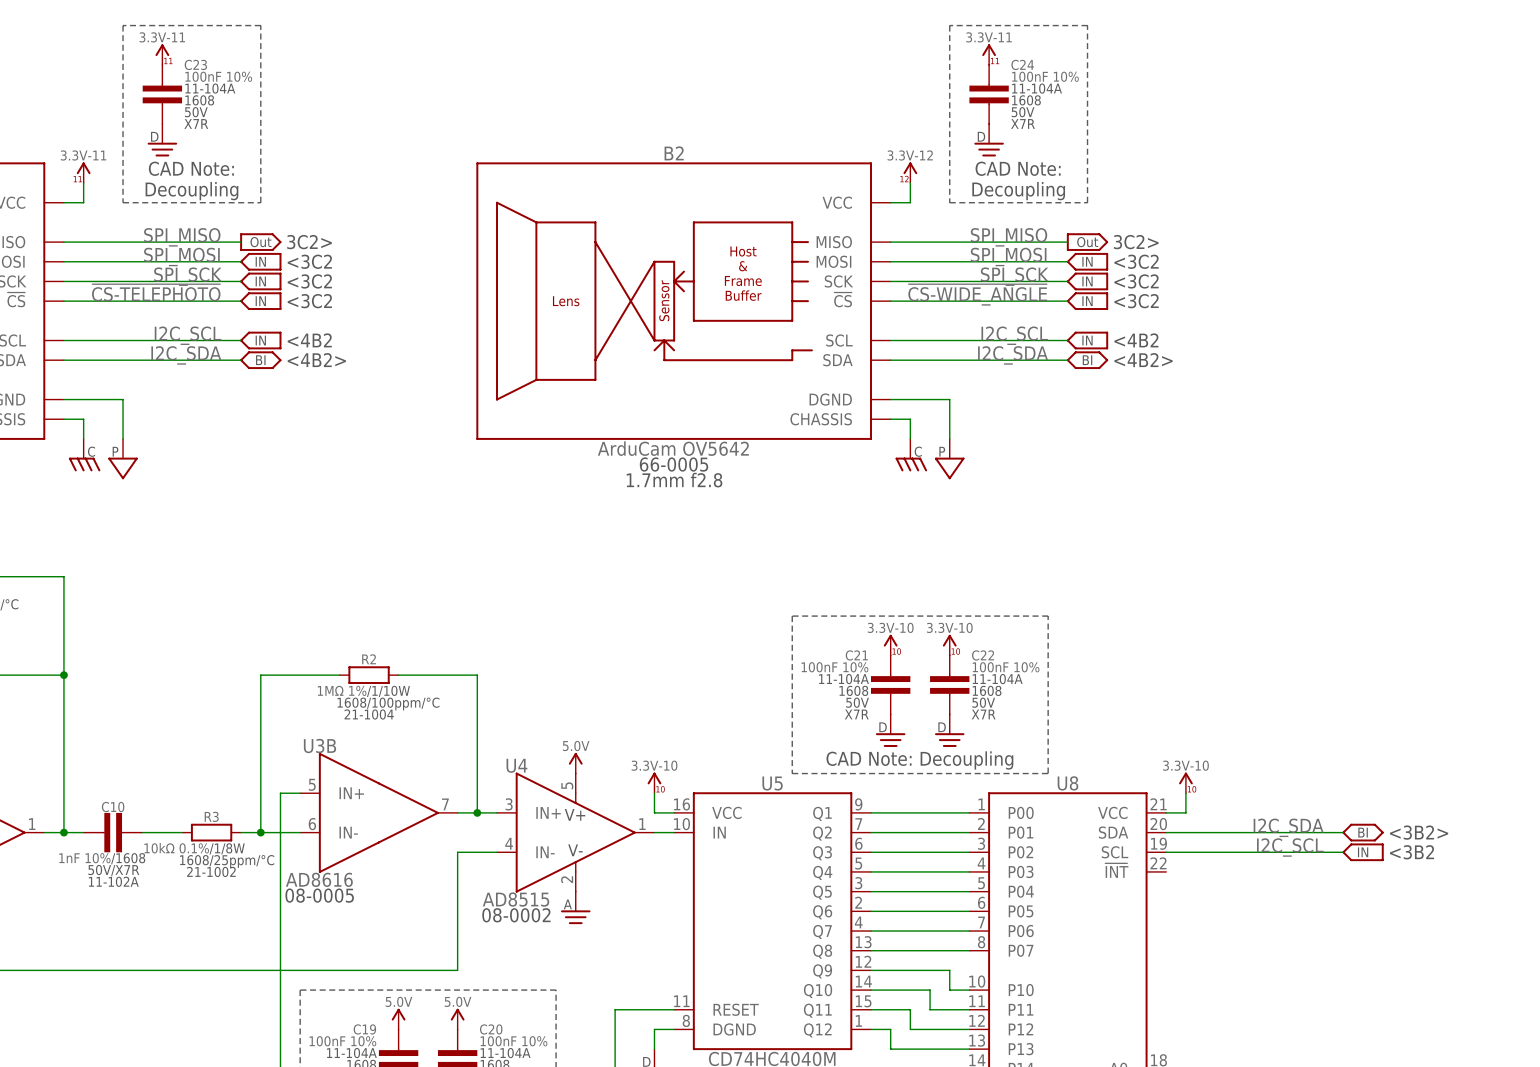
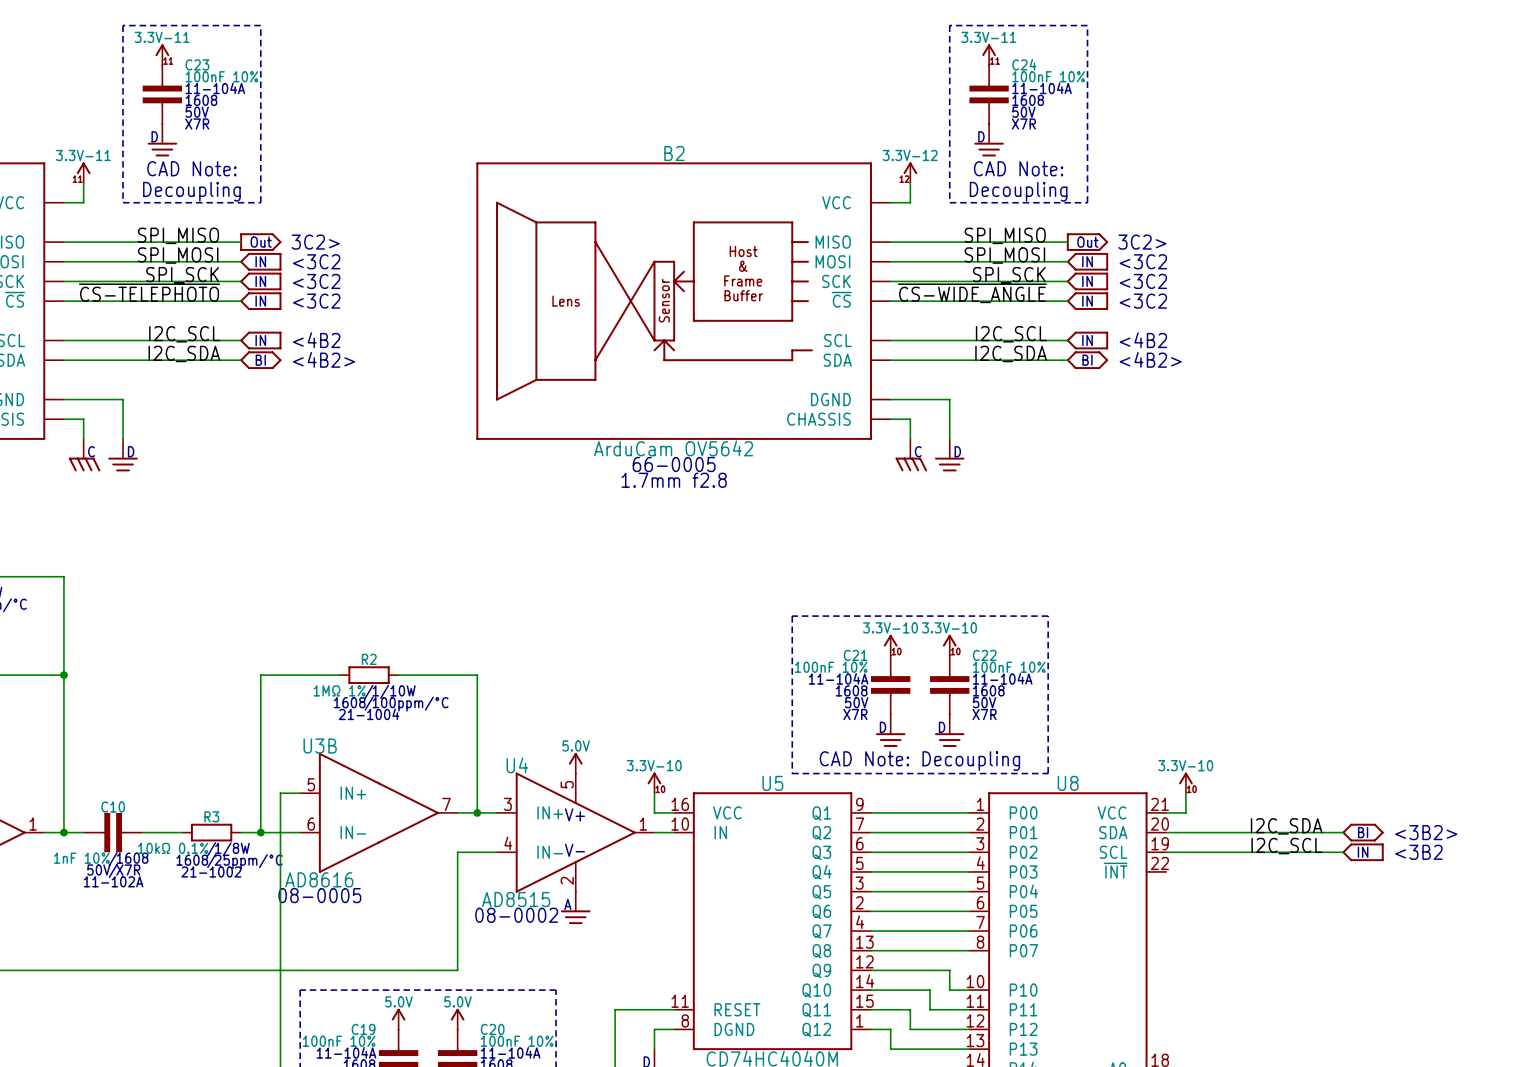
power symbol shape: [108, 438, 138, 480] -> [108, 438, 138, 472]
power symbol shape: [934, 438, 965, 480] -> [934, 438, 965, 472]

